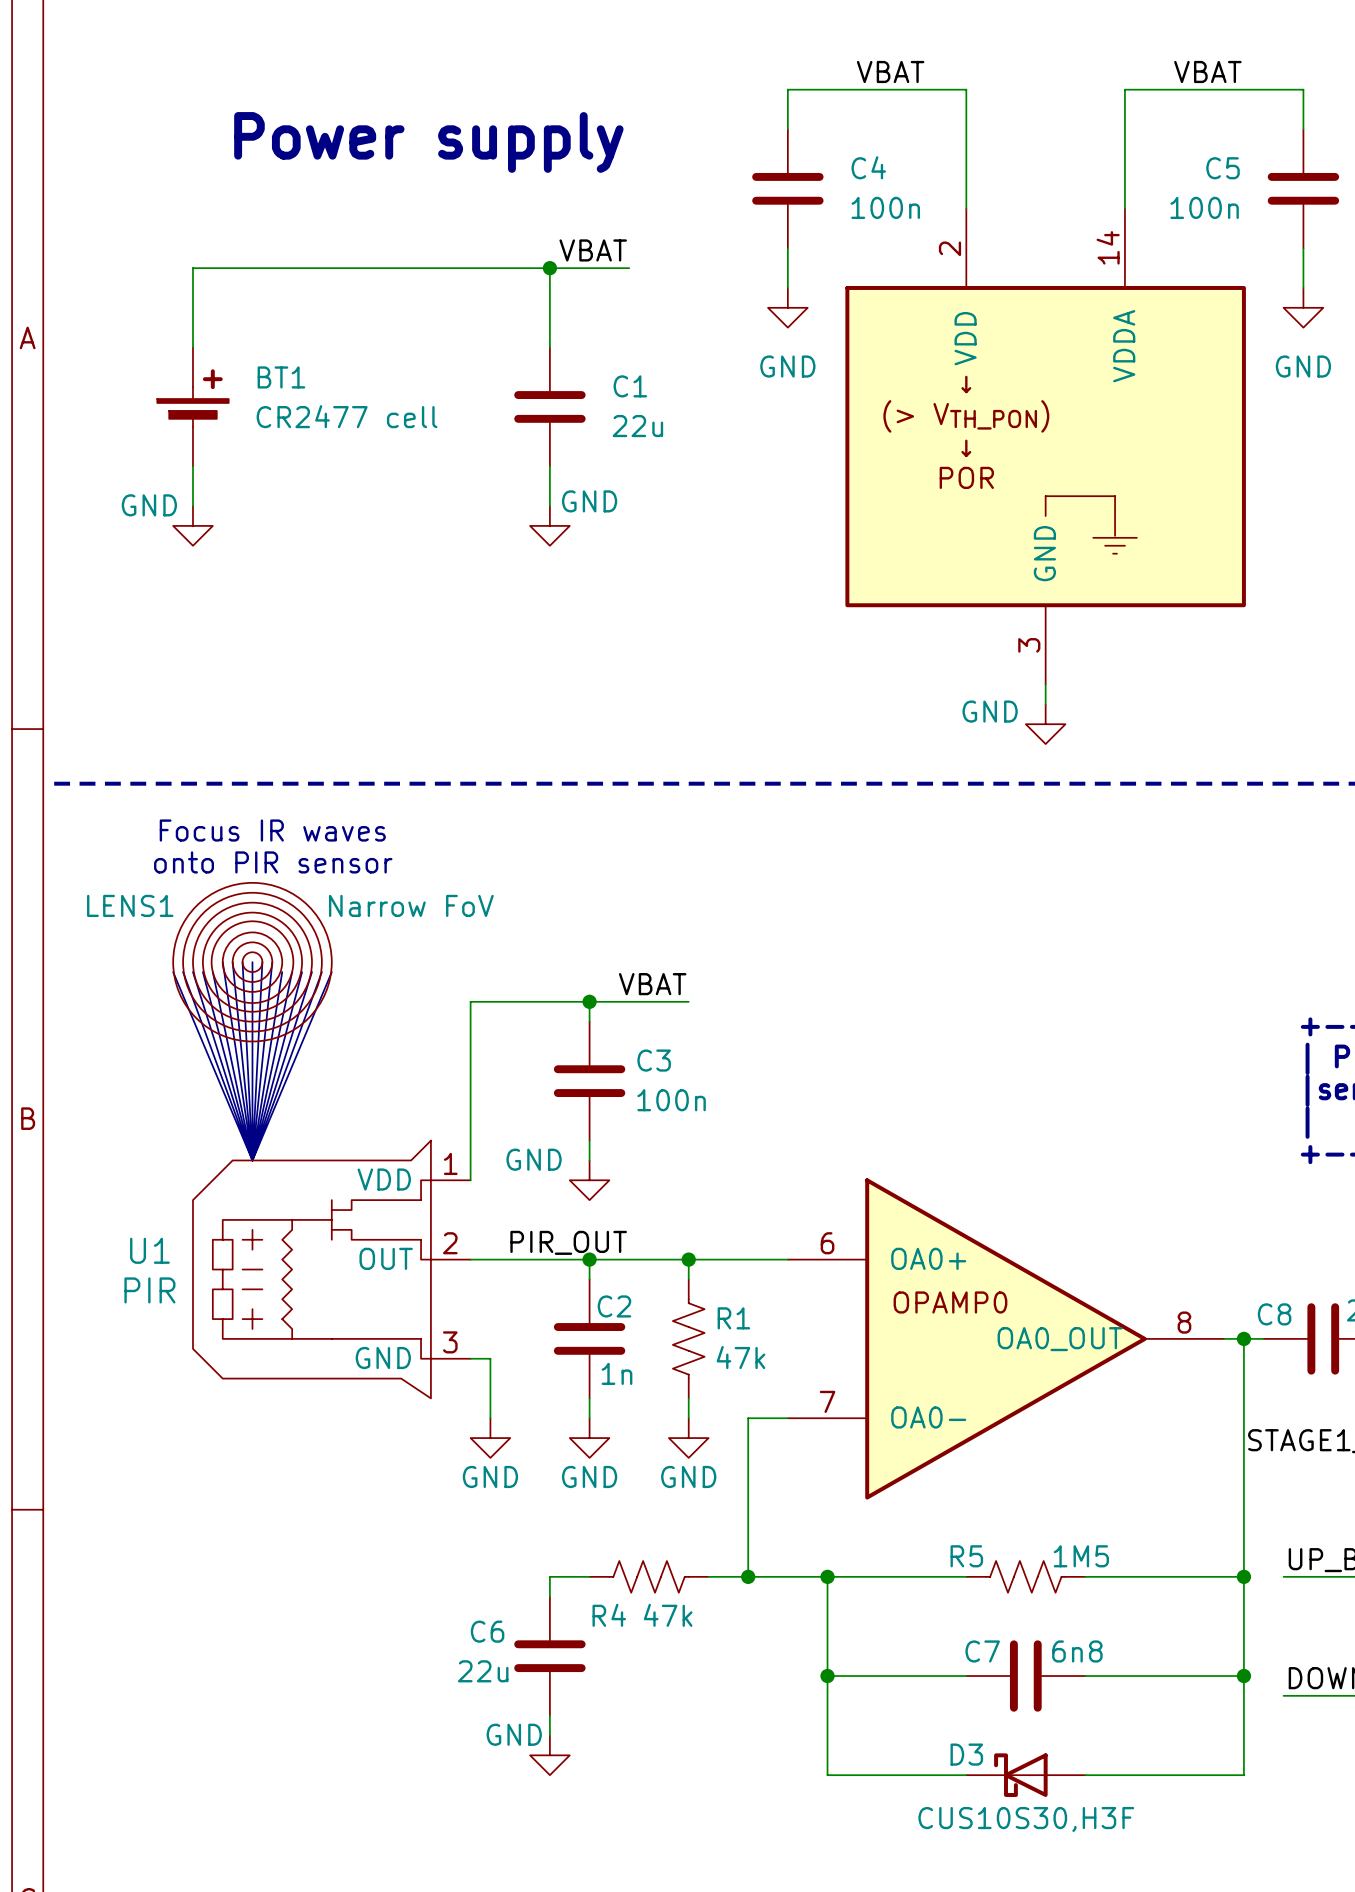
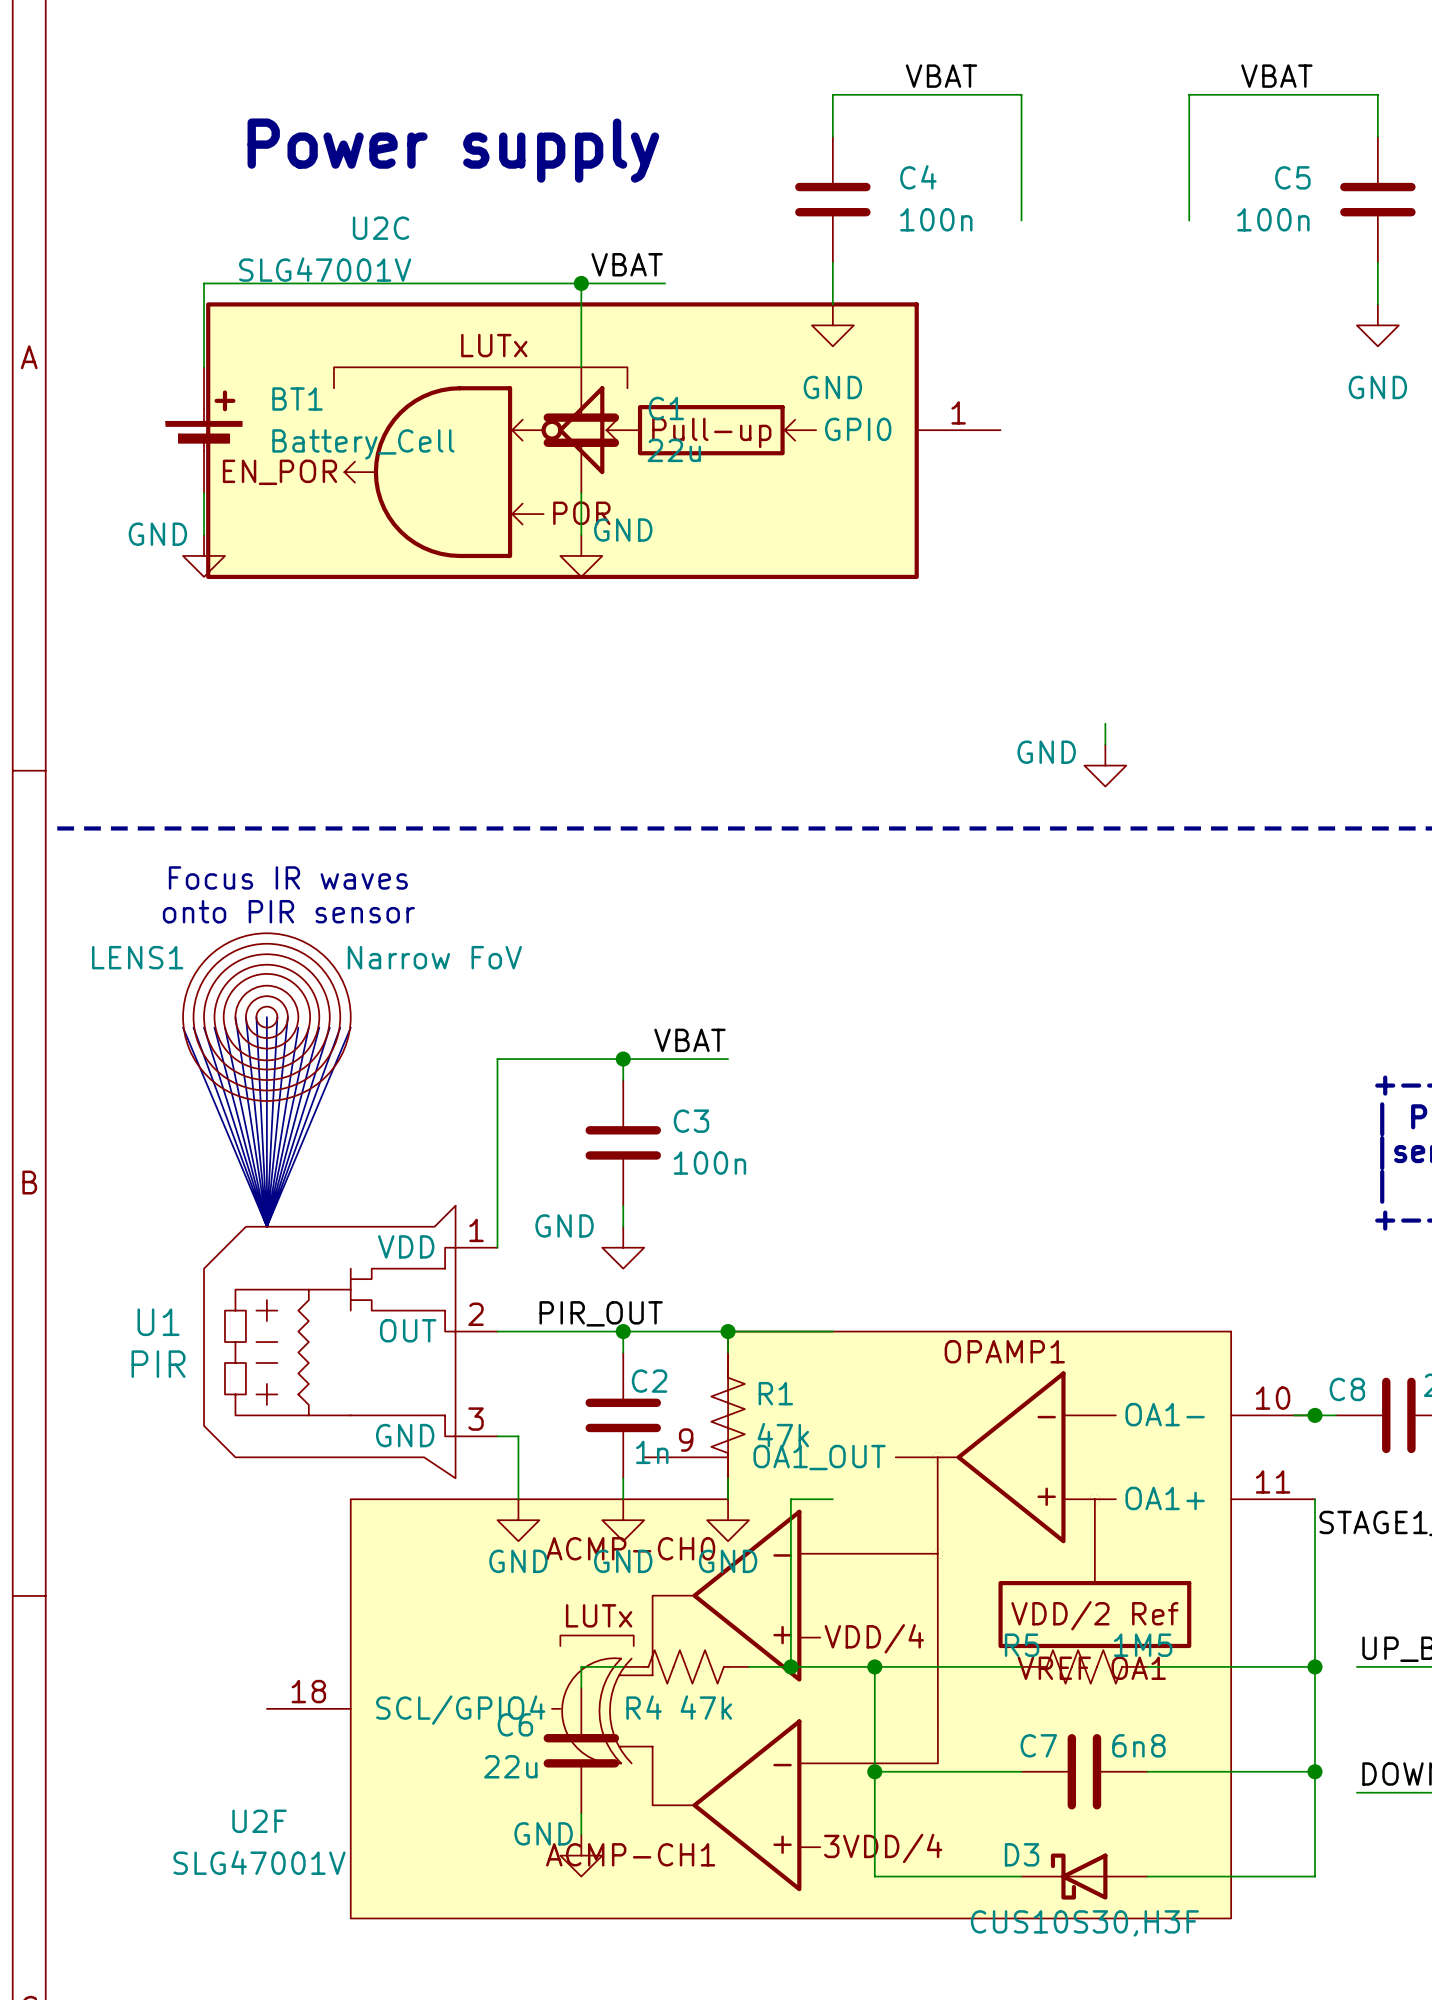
BT1 value: CR2477 cell (347, 416) -> Battery_Cell (363, 444)
U2C: none -> SLG47001V (603, 440)
part: (1045, 446) -> none
part: (1005, 1338) -> none
wire: (1243, 1338) (1243, 1418) -> none
U2F: none -> SLG47001V (790, 1625)

